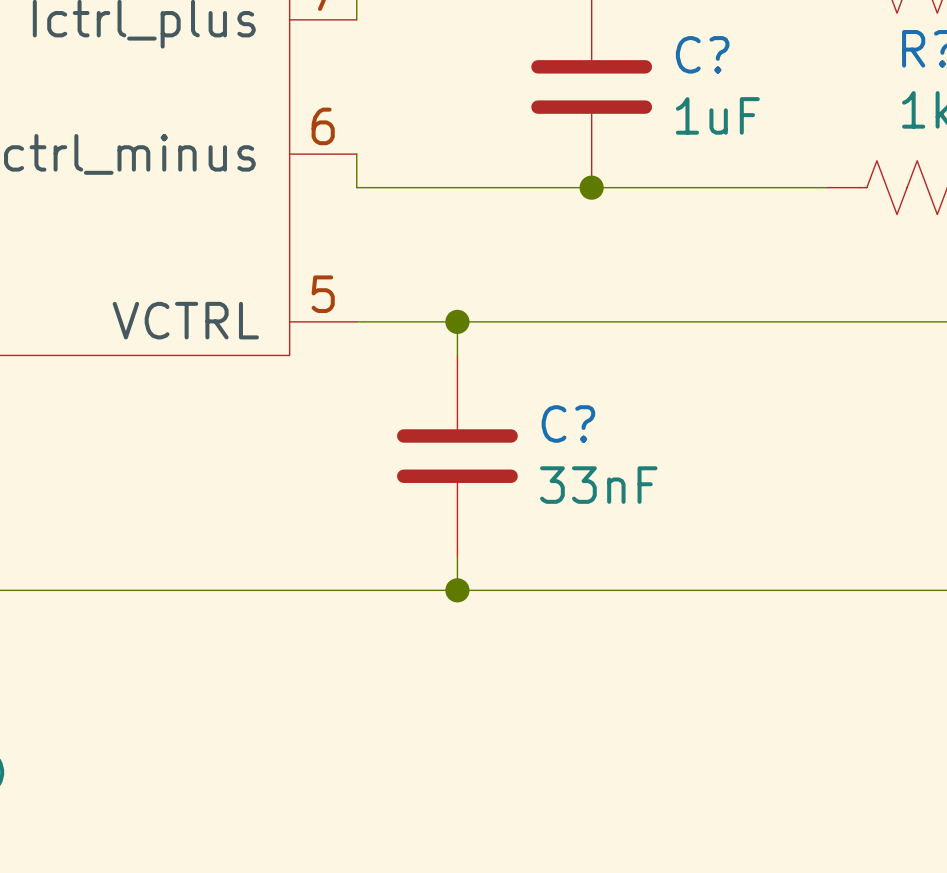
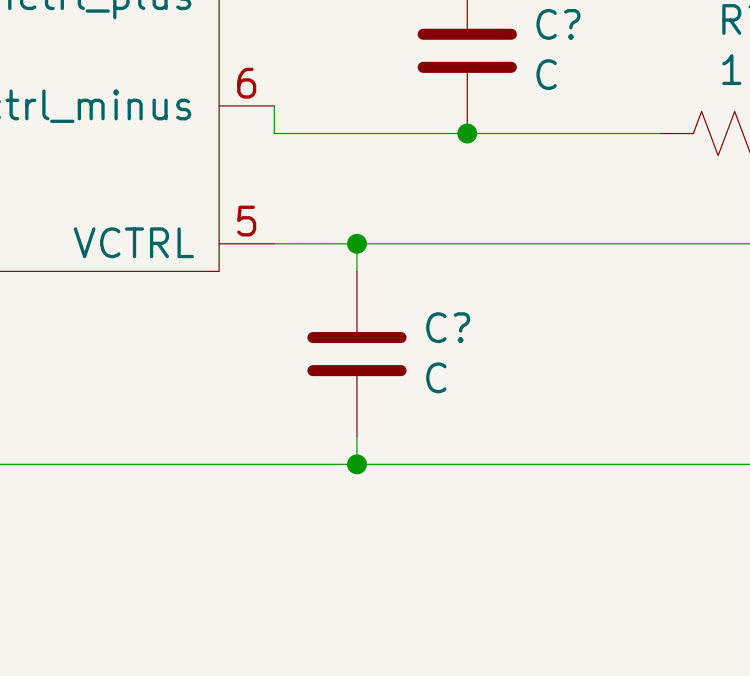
C? value: 1uF (717, 115) -> C (546, 74)
C? value: 33nF (598, 485) -> C (436, 377)

